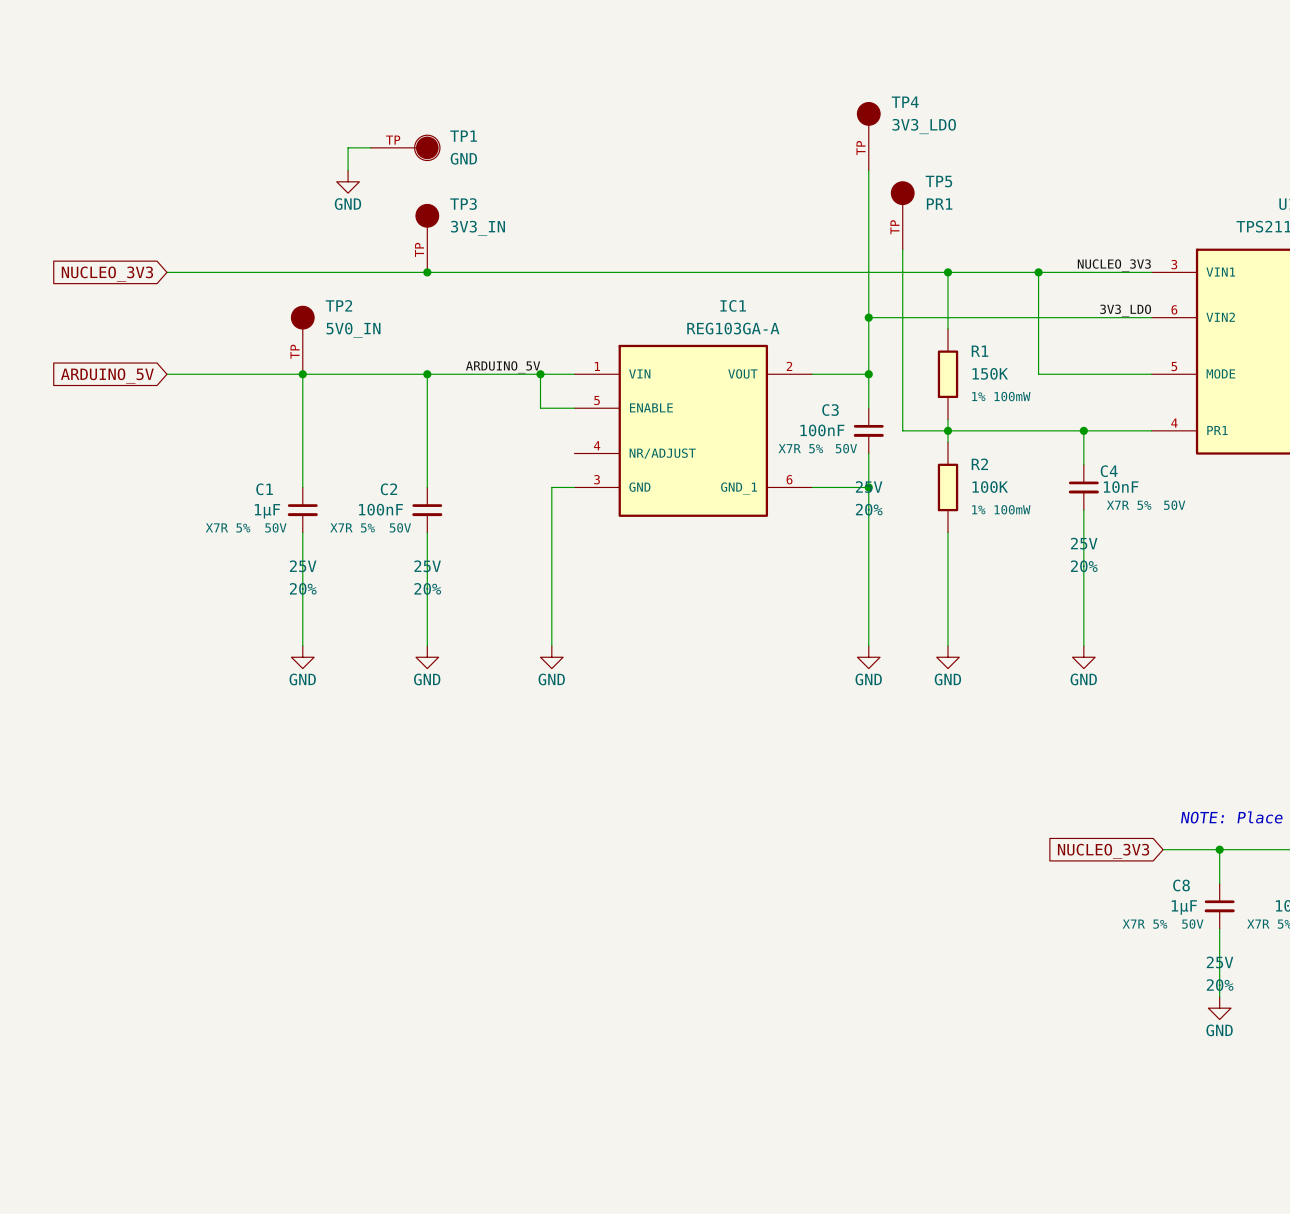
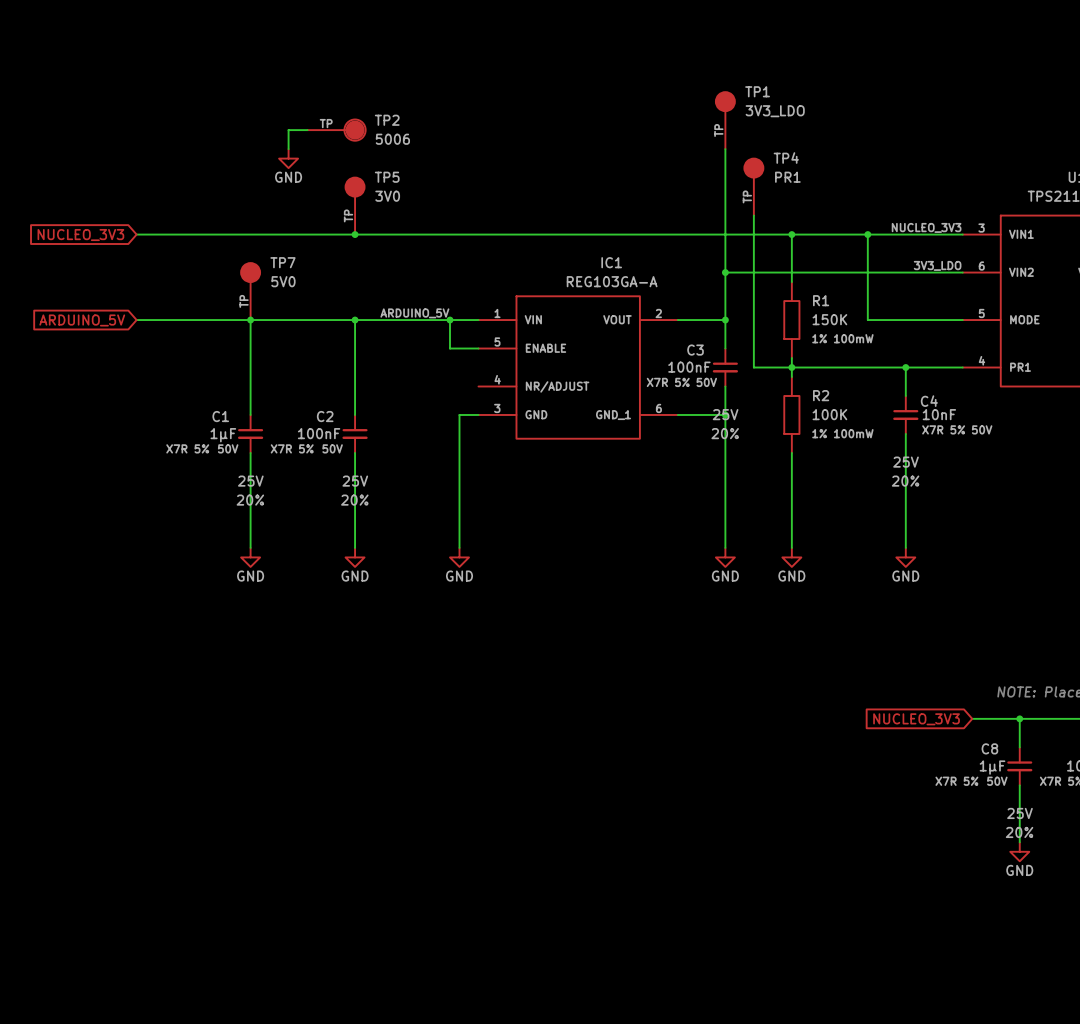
TP4 name: TP4 (905, 102) -> TP1 (757, 91)
TP1 name: TP1 (463, 136) -> TP2 (387, 120)
TP1 value: GND (463, 158) -> 5006 (392, 139)
TP5 name: TP5 (938, 181) -> TP4 (786, 158)
TP3 name: TP3 (463, 204) -> TP5 (387, 177)
TP3 value: 3V3_IN (477, 228) -> 3V0 (387, 196)
TP2 name: TP2 (338, 305) -> TP7 (282, 262)
TP2 value: 5V0_IN (353, 330) -> 5V0 (283, 281)

